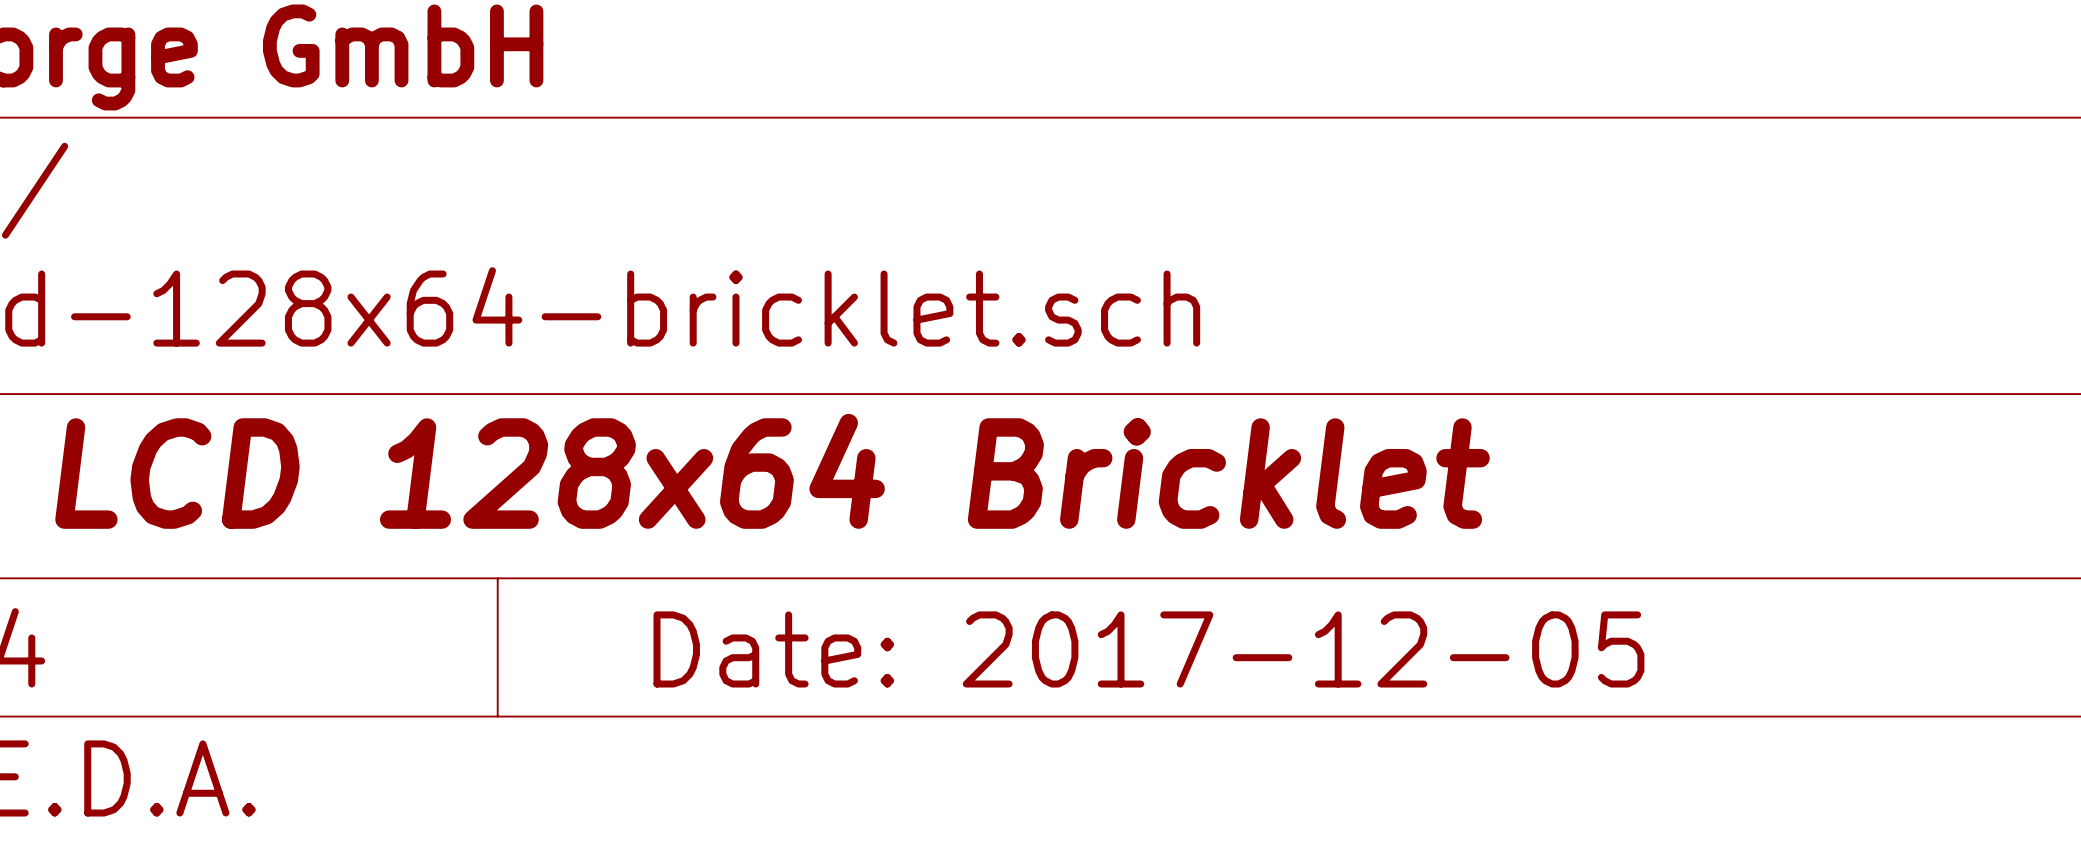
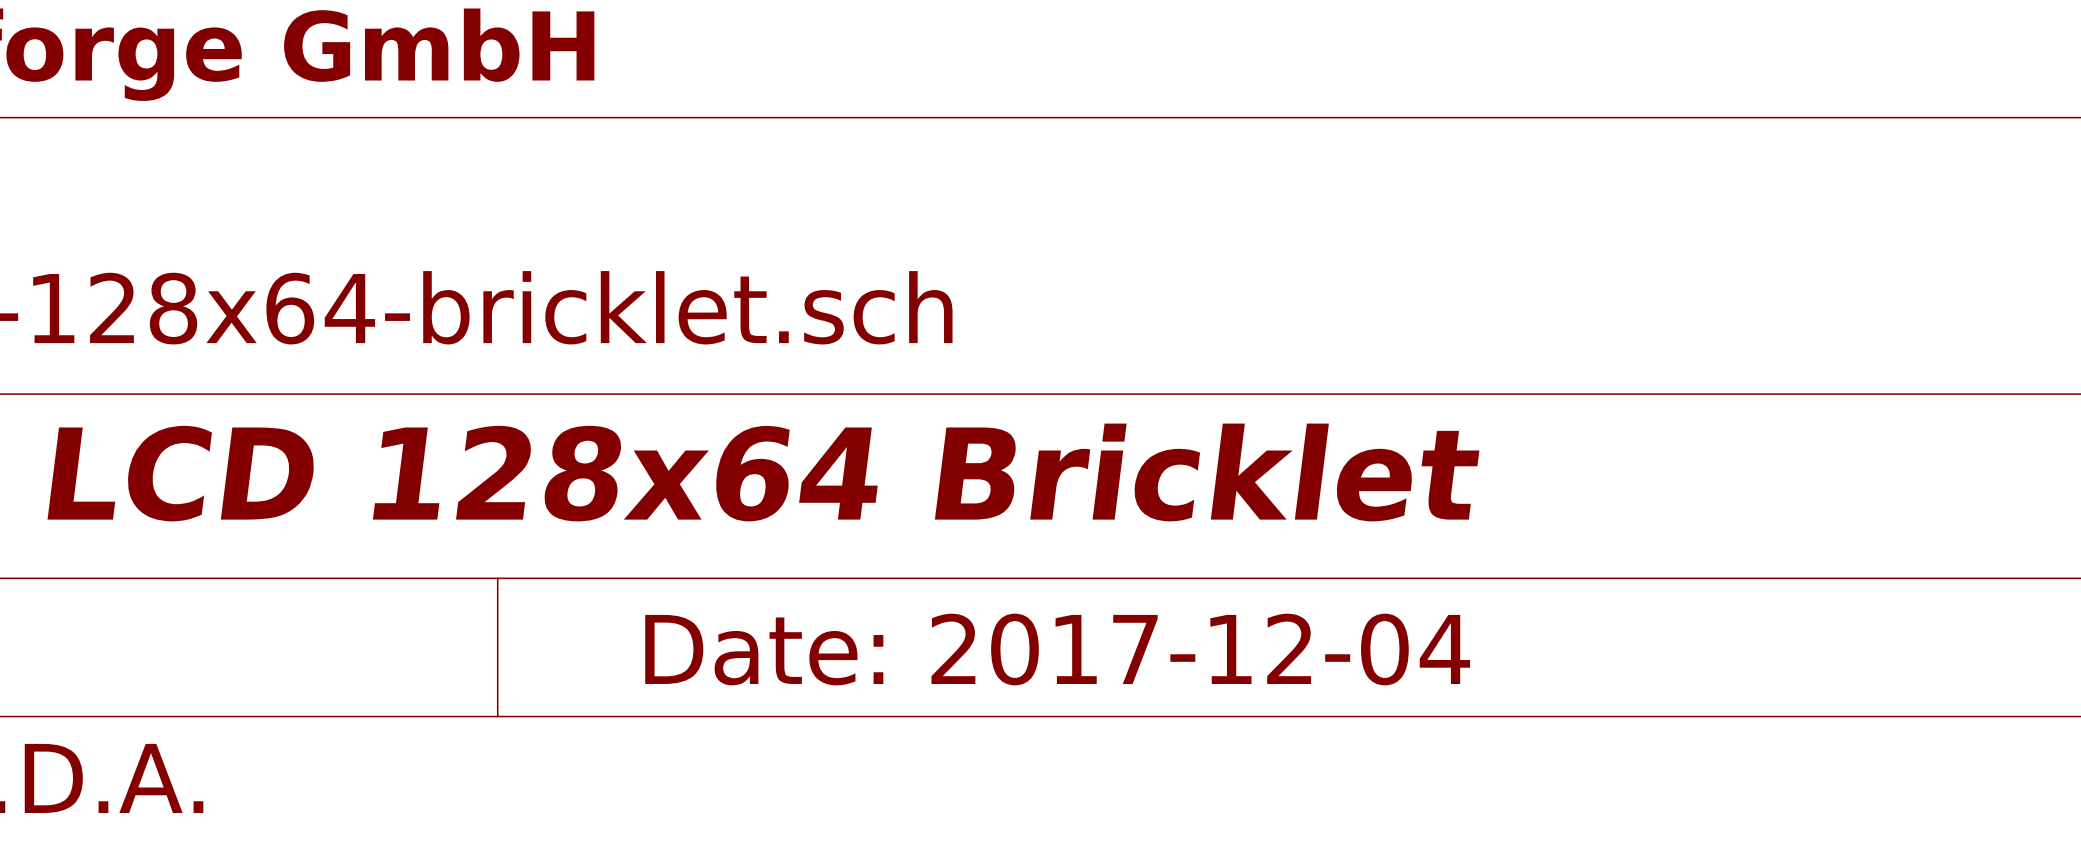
title block: Date: 2017-12-05 (1148, 649) -> Date: 2017-12-04 (1057, 649)

